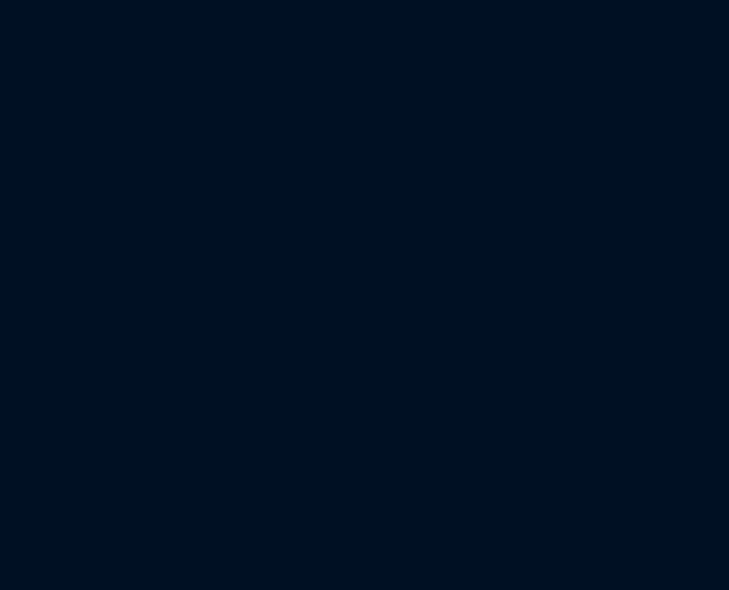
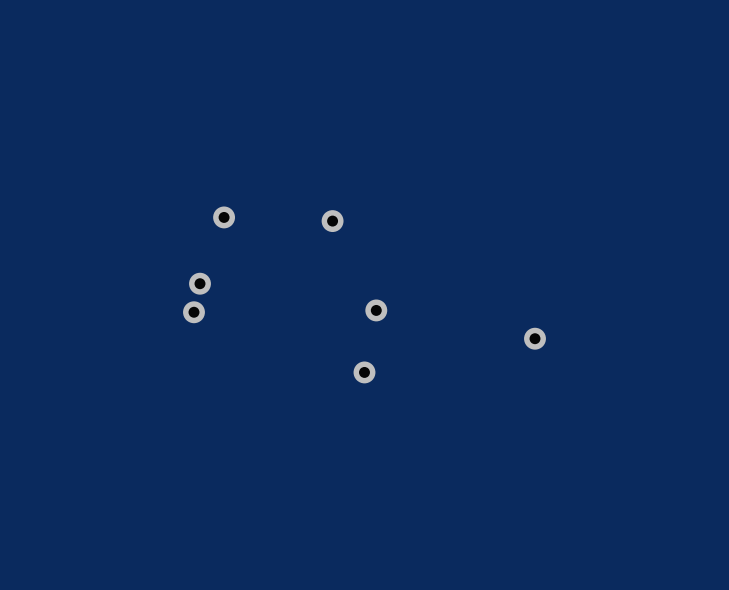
via: none -> (224, 217)
via: none -> (332, 221)
via: none -> (199, 283)
via: none -> (376, 310)
via: none -> (193, 312)
via: none -> (535, 338)
via: none -> (364, 372)

